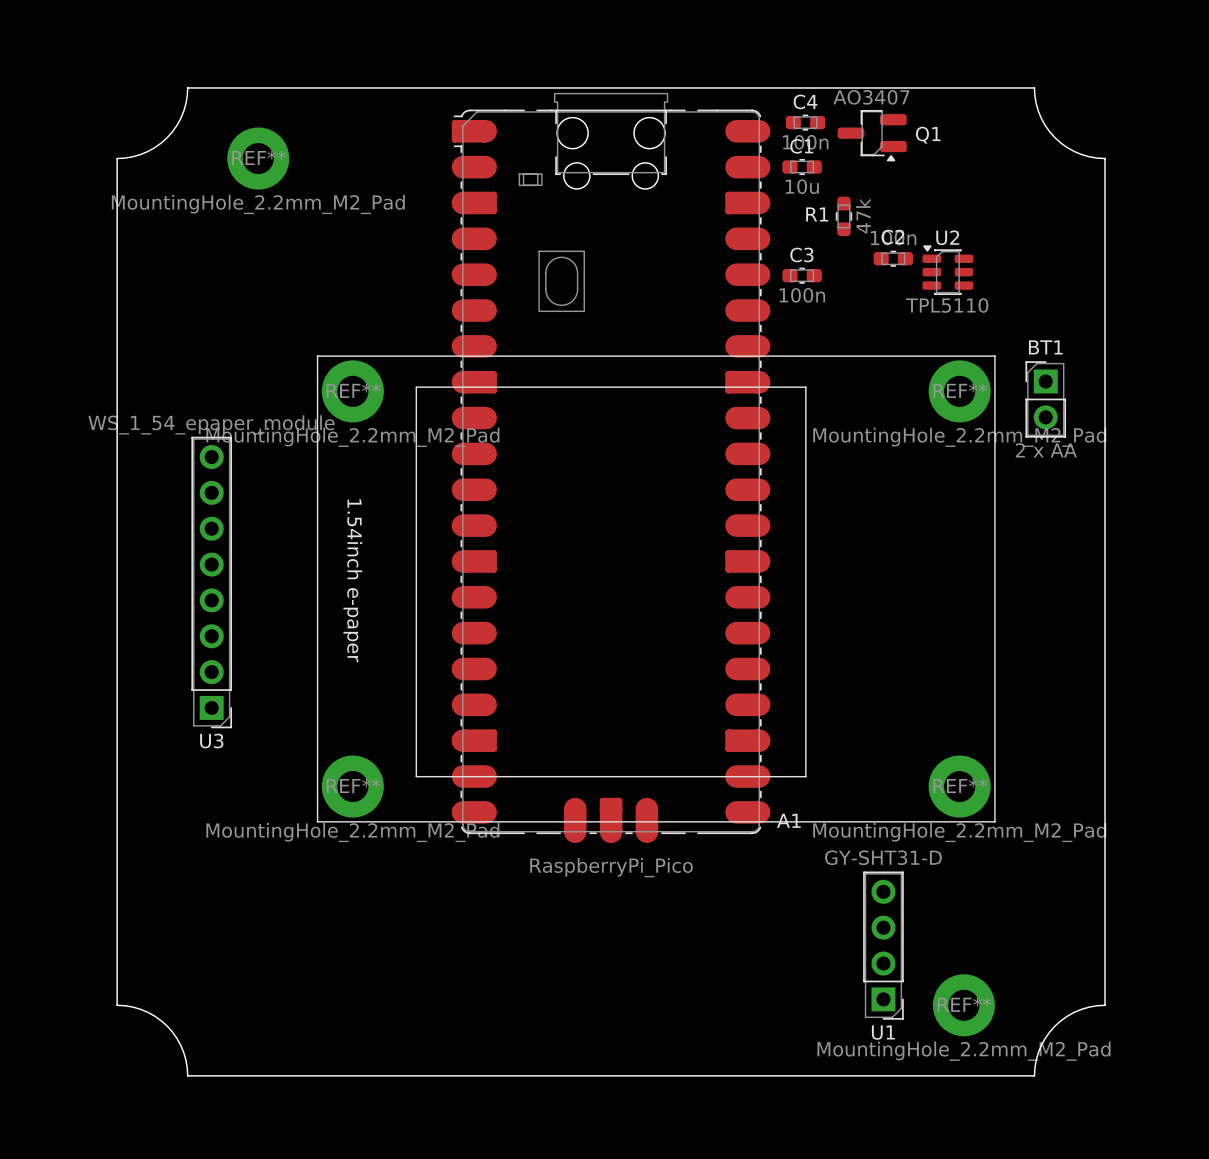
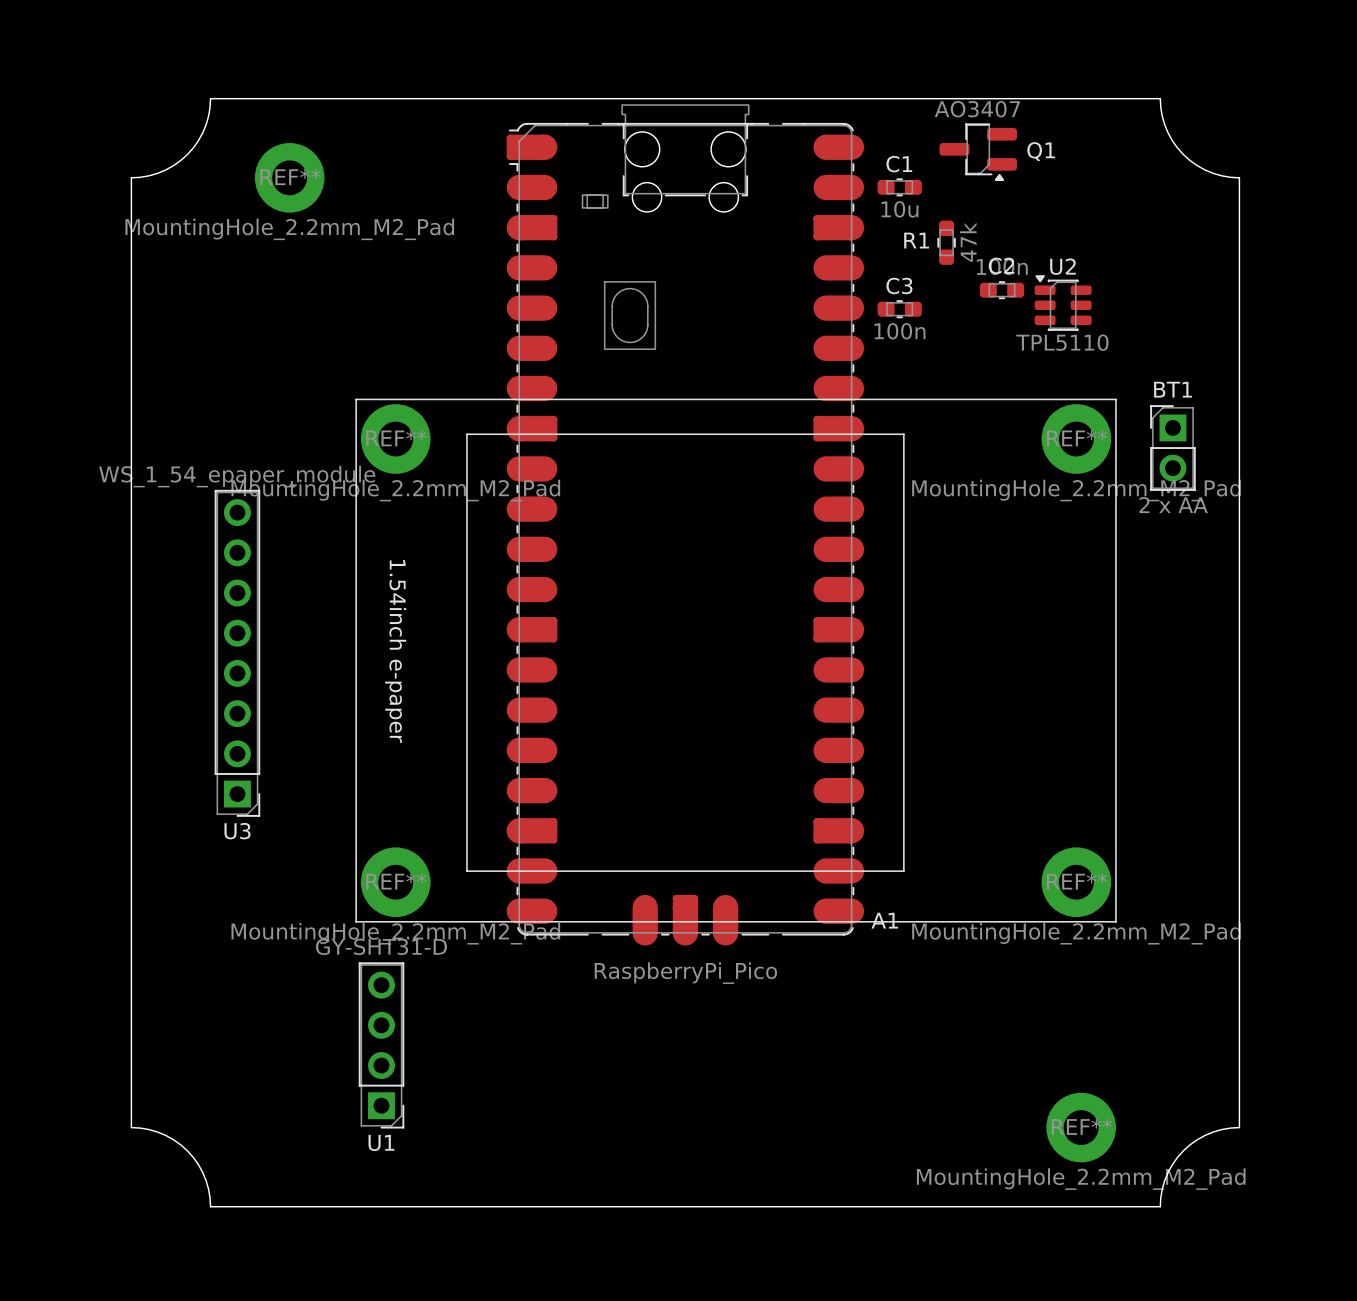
C4: 100n (805, 122) -> none
U1 position: (883, 945) -> (381, 1045)

